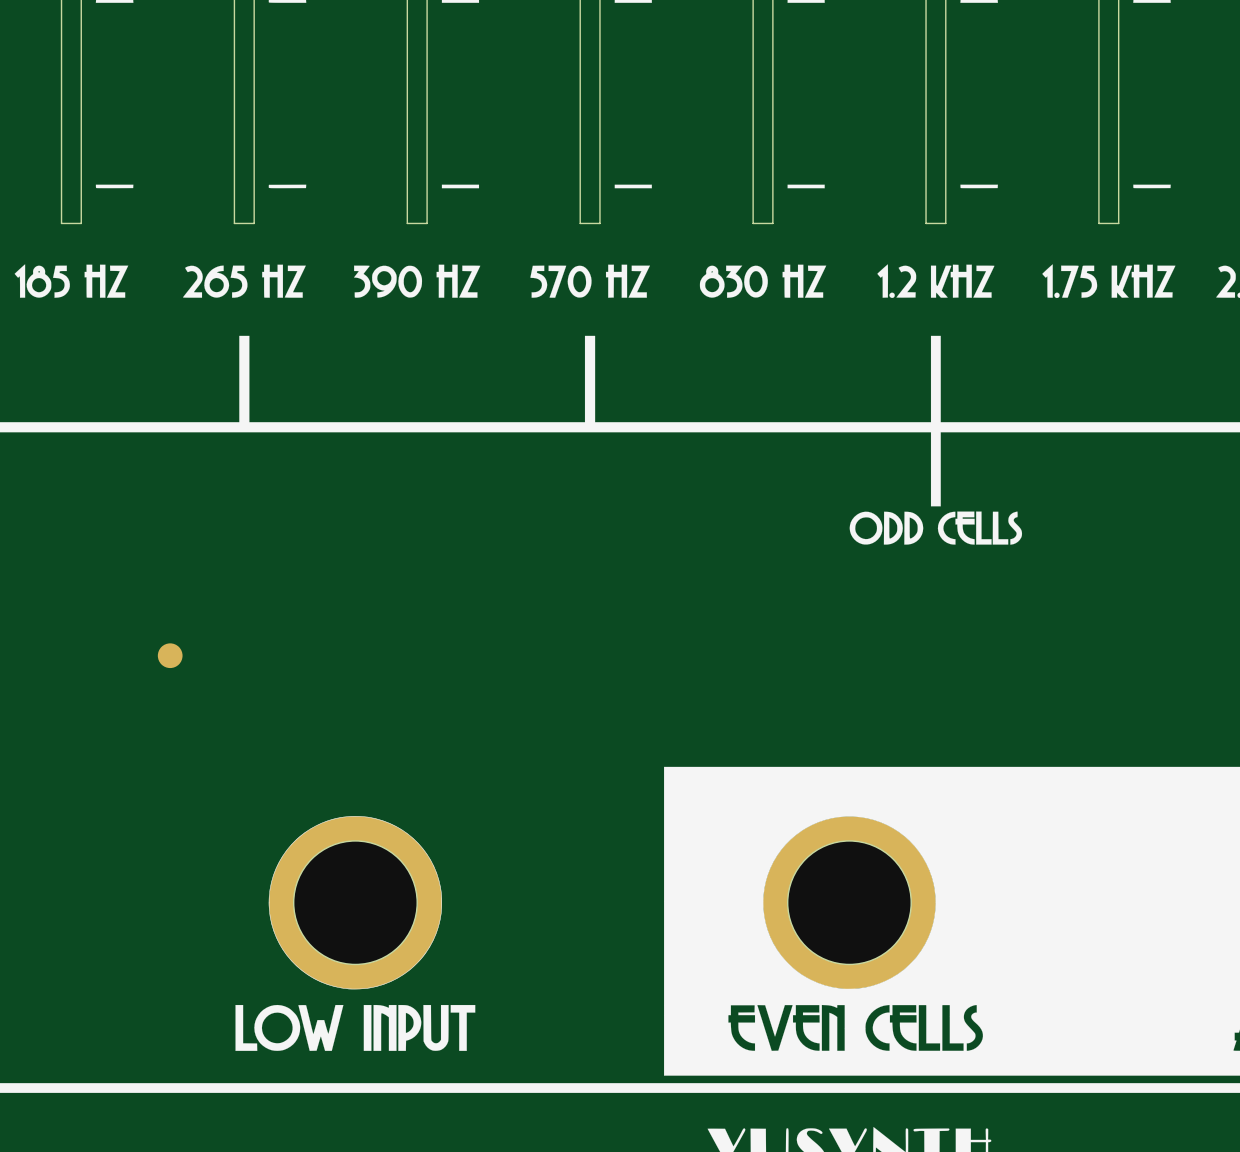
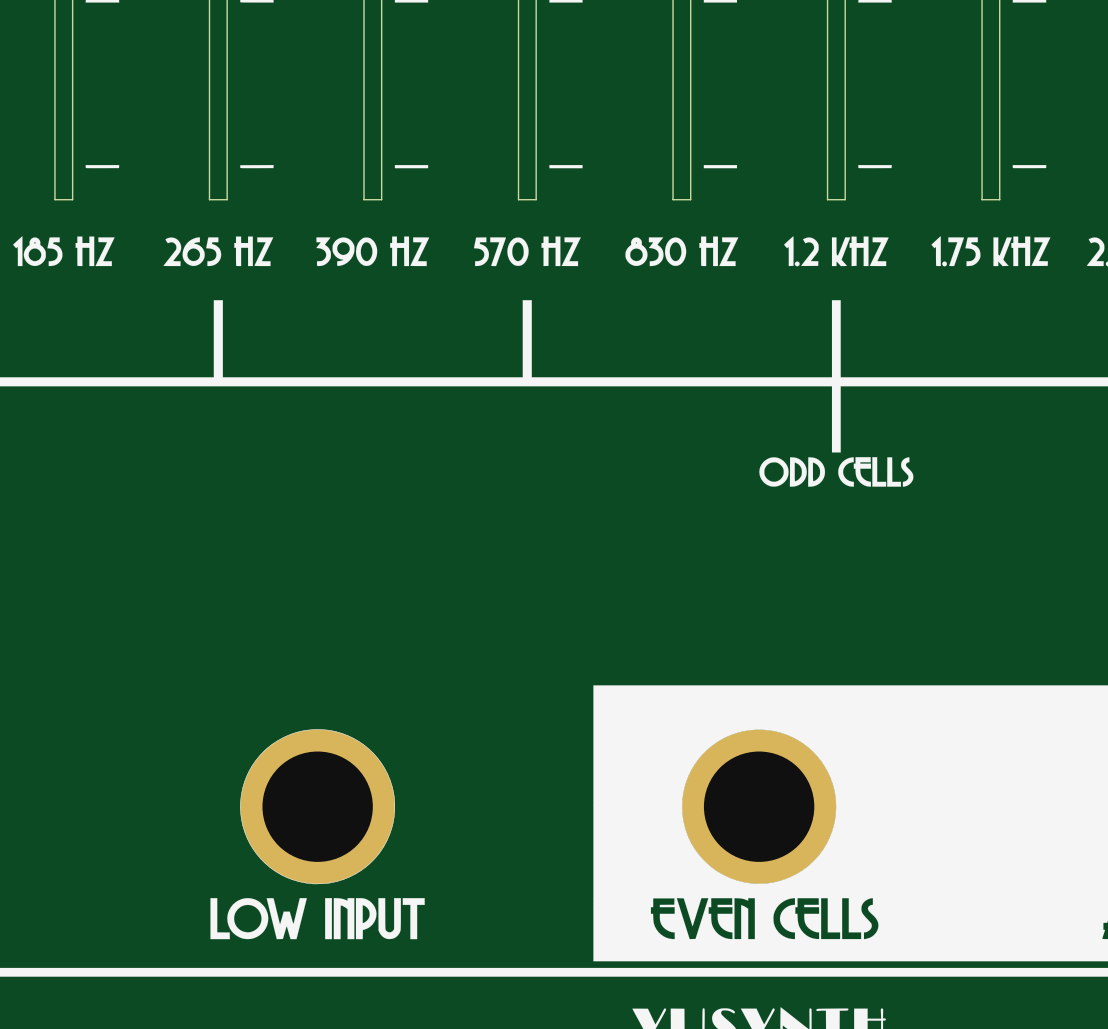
part: (170, 655) -> none
part footprint: [268, 816, 442, 990] -> [240, 729, 395, 884]
part footprint: [763, 816, 936, 990] -> [681, 729, 837, 884]

